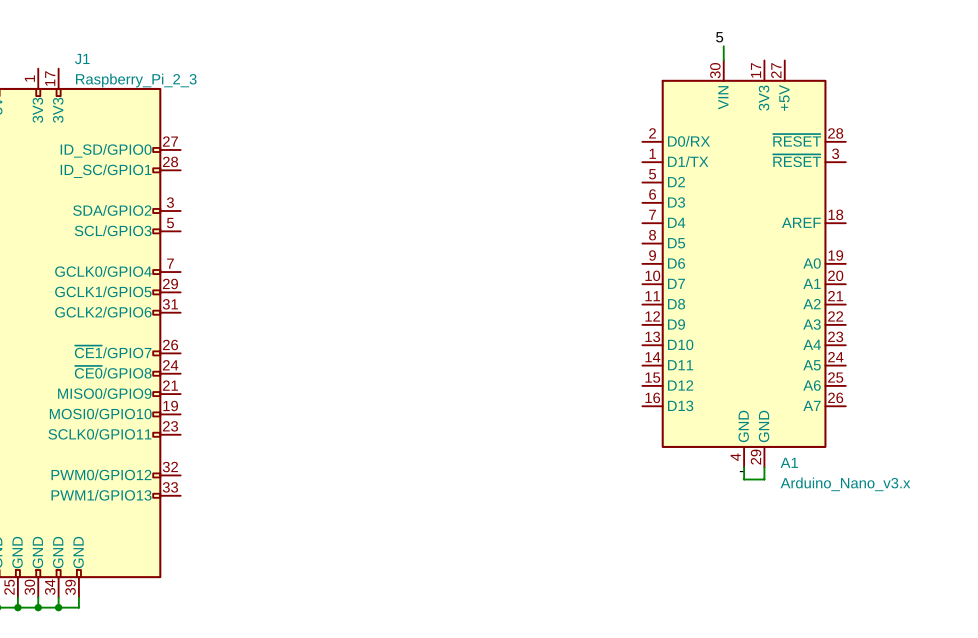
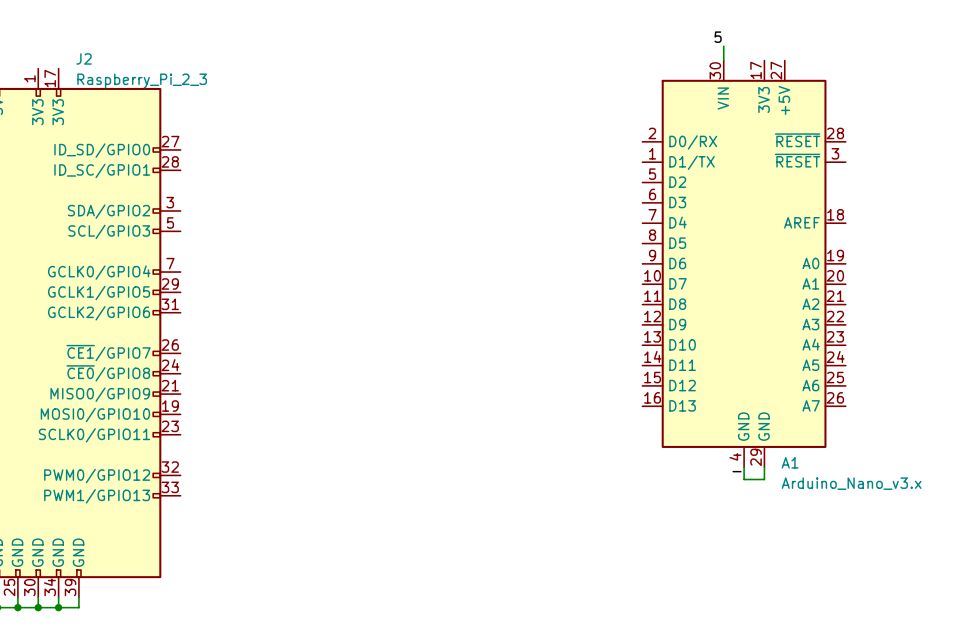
J1 name: J1 (82, 59) -> J2 (84, 58)

